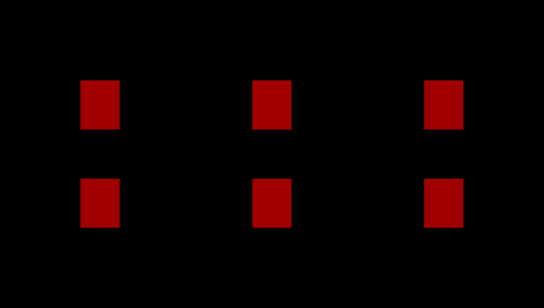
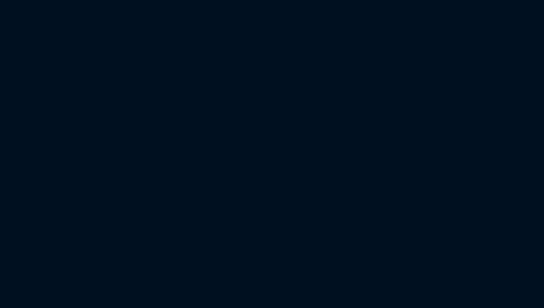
part: (100, 154) -> none
part: (271, 154) -> none
part: (443, 154) -> none

